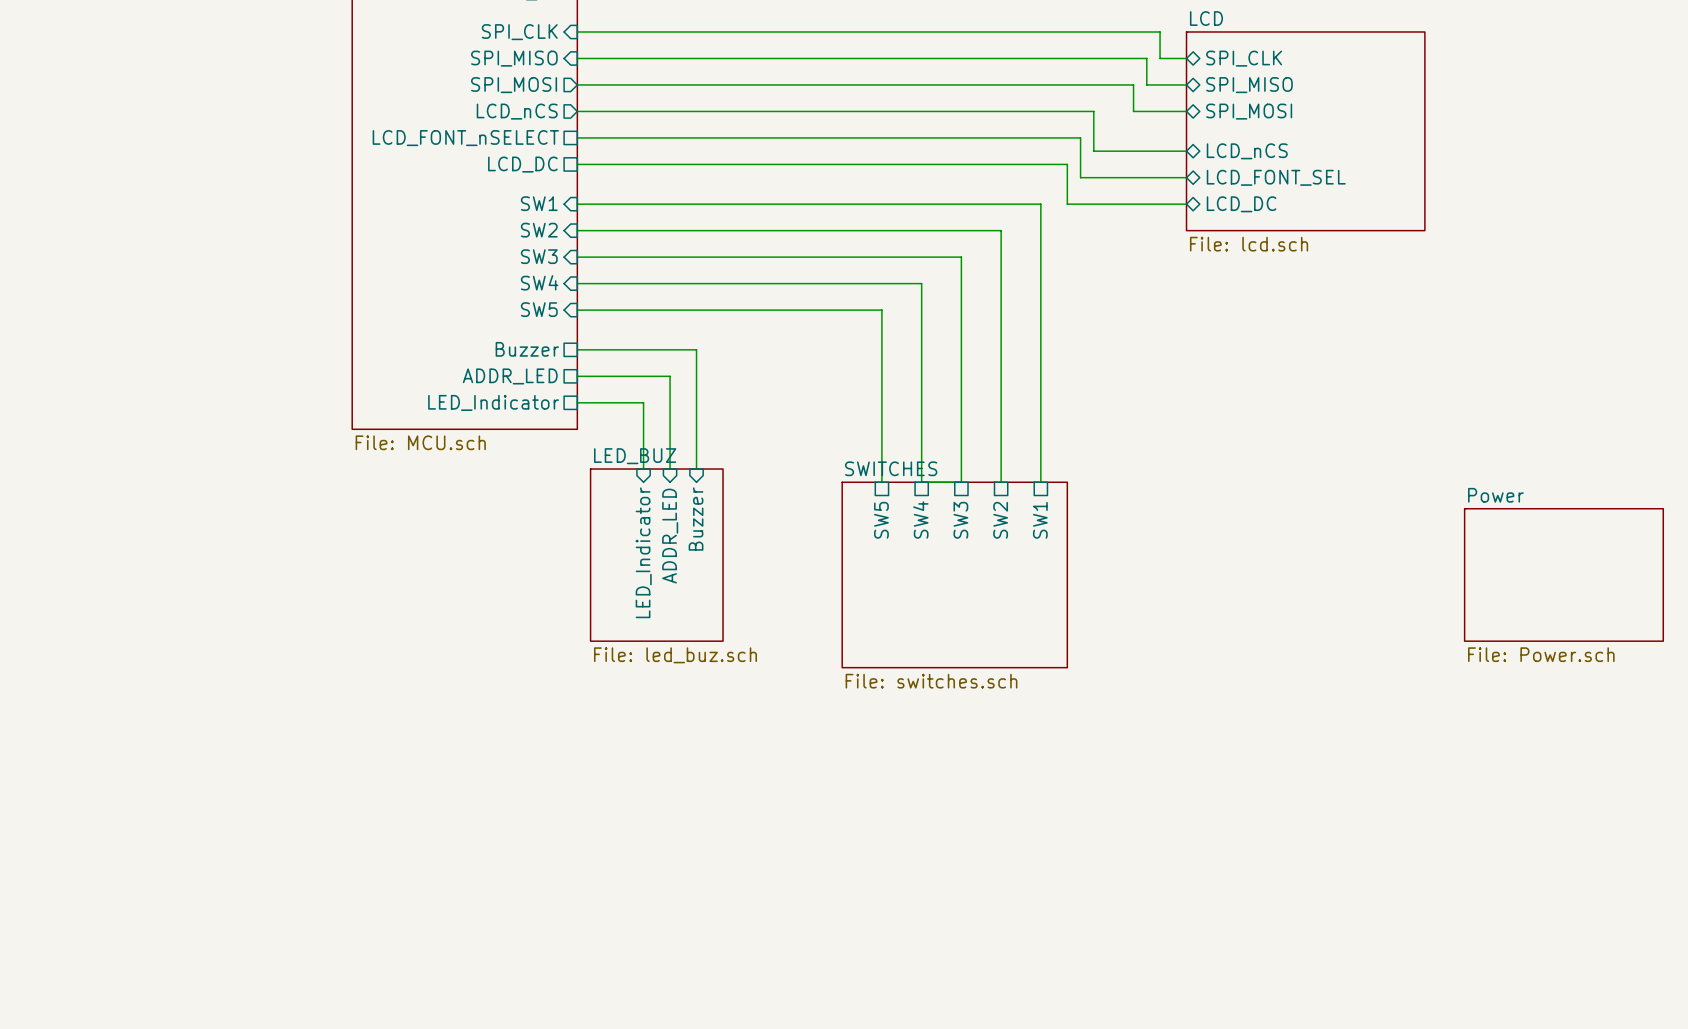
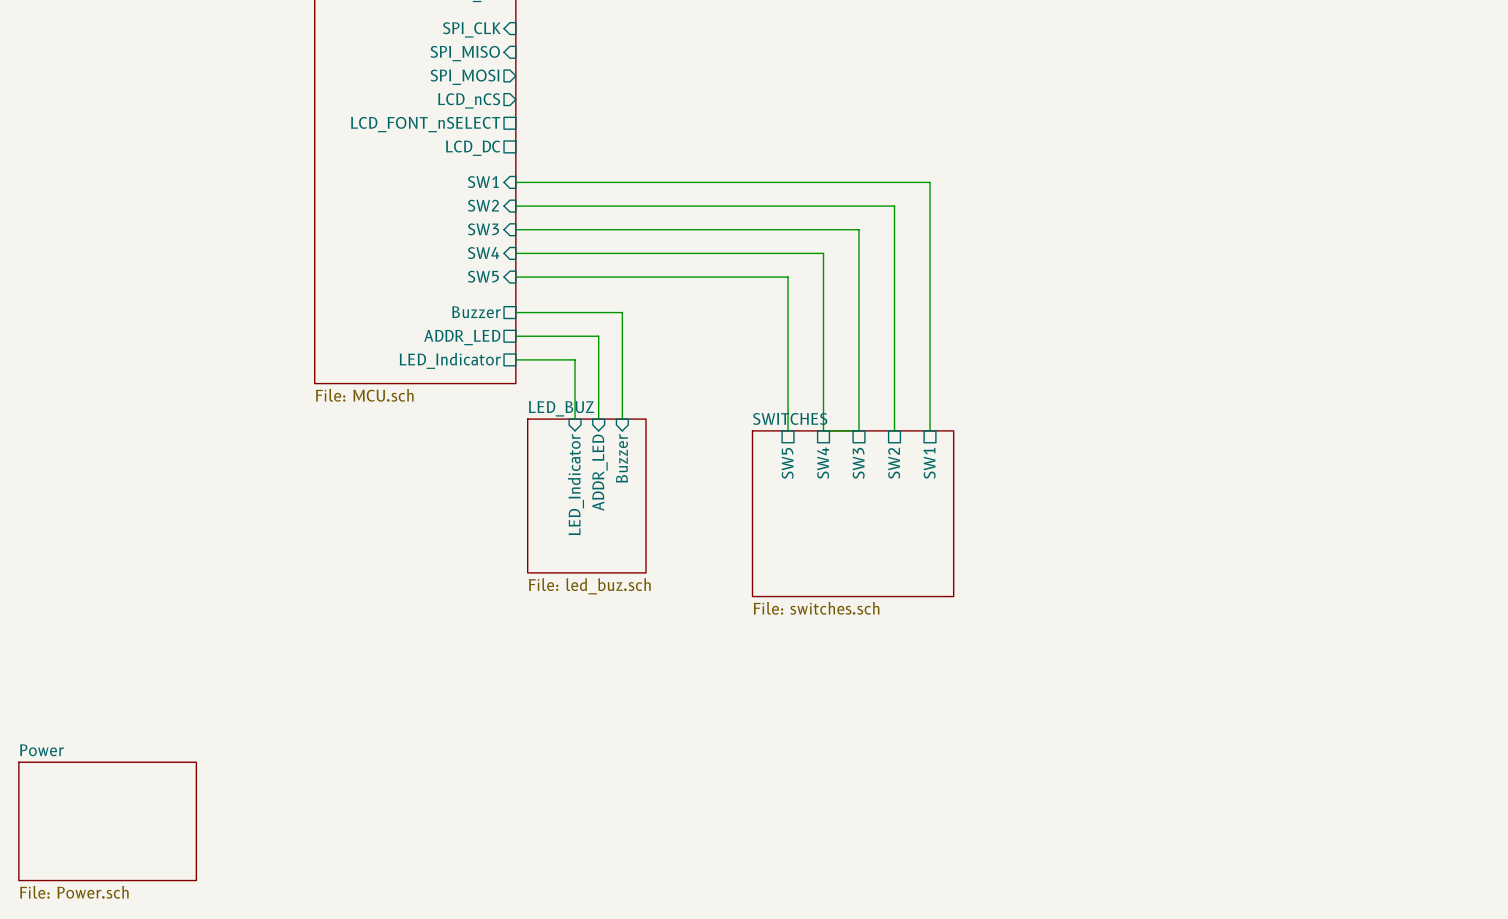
wire: (577, 31) (1160, 31) (1160, 58) (1186, 58) -> none
wire: (577, 58) (1146, 58) (1146, 84) (1186, 84) -> none
sheet pin: SPI_CLK (1244, 58) -> none
wire: (577, 84) (1133, 84) (1133, 111) (1186, 111) -> none
sheet pin: SPI_MISO (1249, 85) -> none
wire: (577, 111) (1093, 111) (1093, 151) (1186, 151) -> none
sheet pin: SPI_MOSI (1249, 111) -> none
sheet LCD: File: lcd.sch (1305, 131) -> none
wire: (577, 137) (1080, 137) (1080, 177) (1186, 177) -> none
sheet pin: LCD_nCS (1247, 151) -> none
wire: (577, 164) (1067, 164) (1067, 204) (1186, 204) -> none
sheet pin: LCD_FONT_SEL (1276, 177) -> none
sheet pin: LCD_DC (1241, 204) -> none
sheet Power: File: Power.sch (1563, 574) -> none
sheet Power: none -> File: Power.sch (107, 821)

